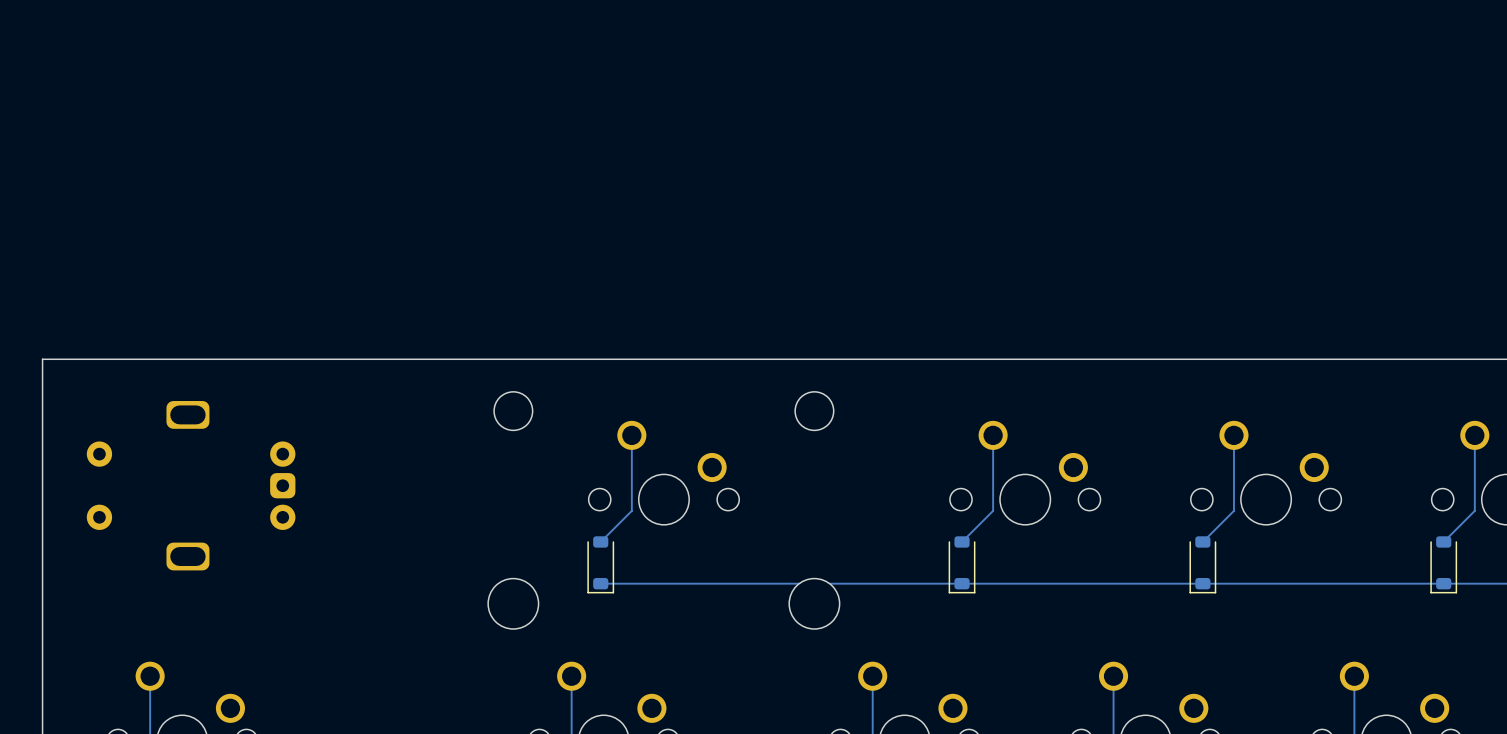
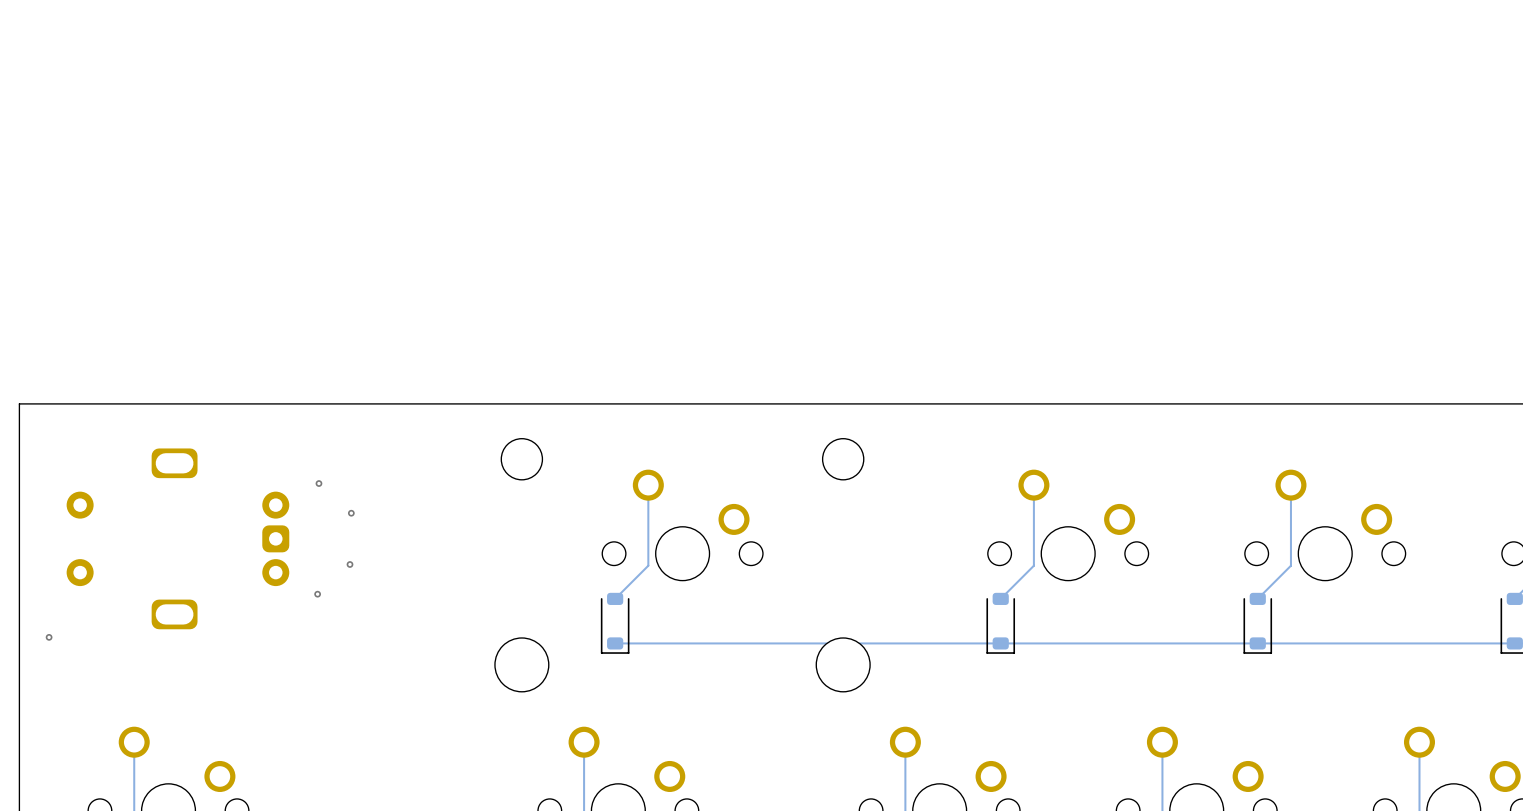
via: none -> (318, 483)
via: none -> (351, 513)
via: none -> (349, 564)
via: none -> (317, 594)
via: none -> (49, 637)

